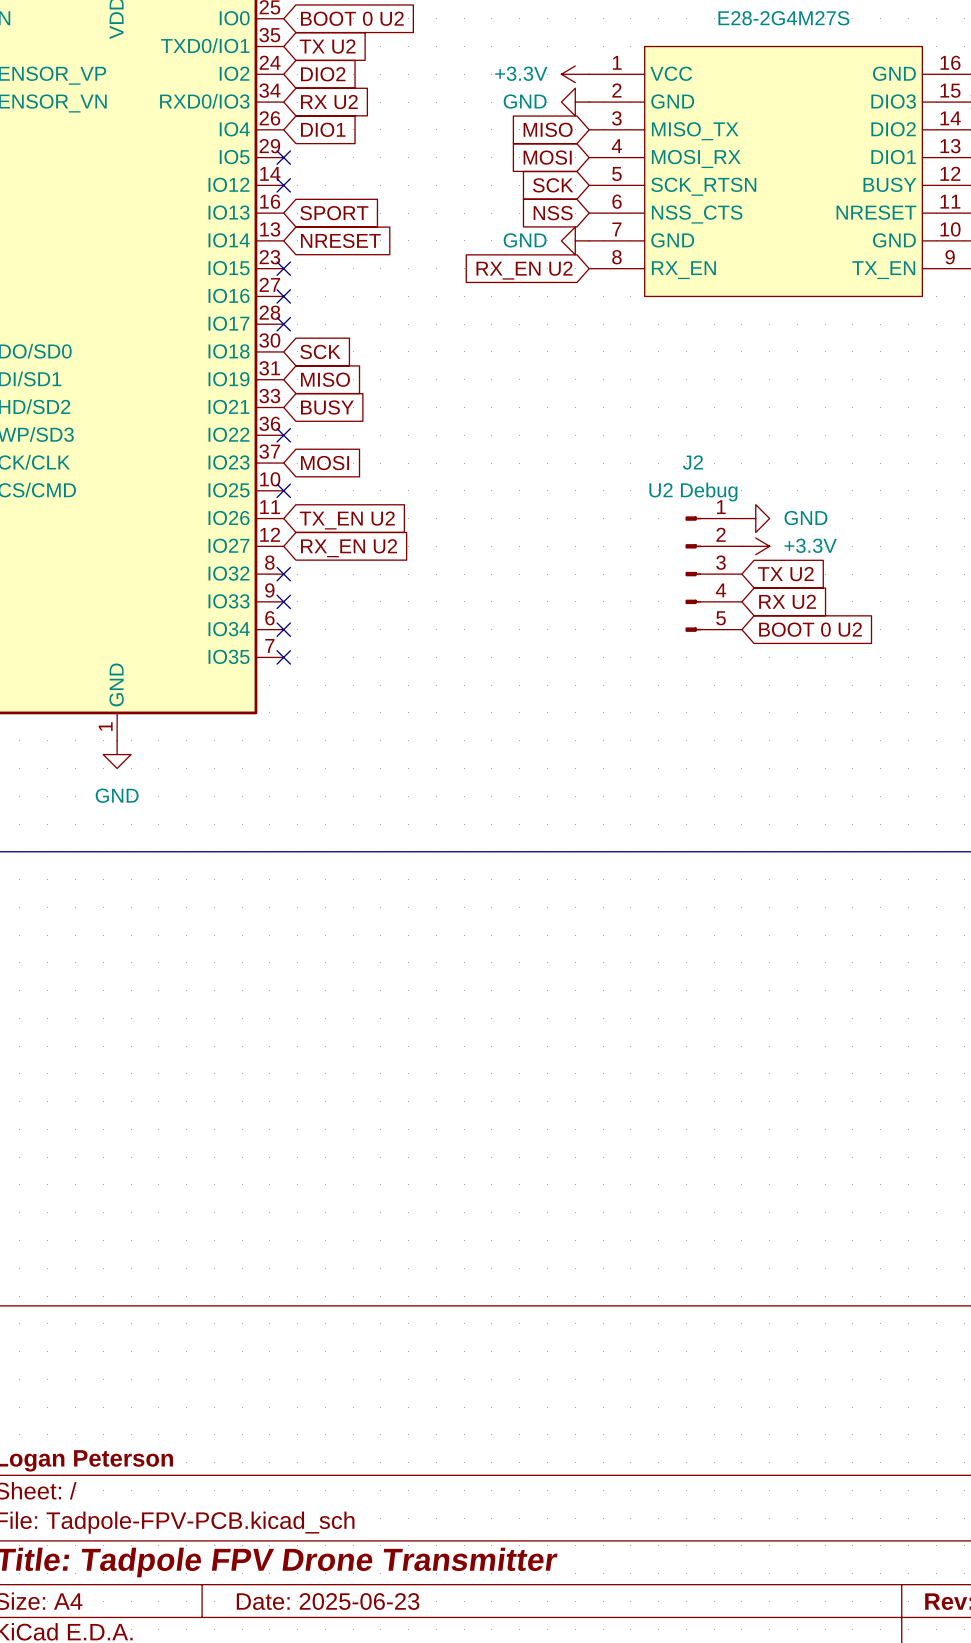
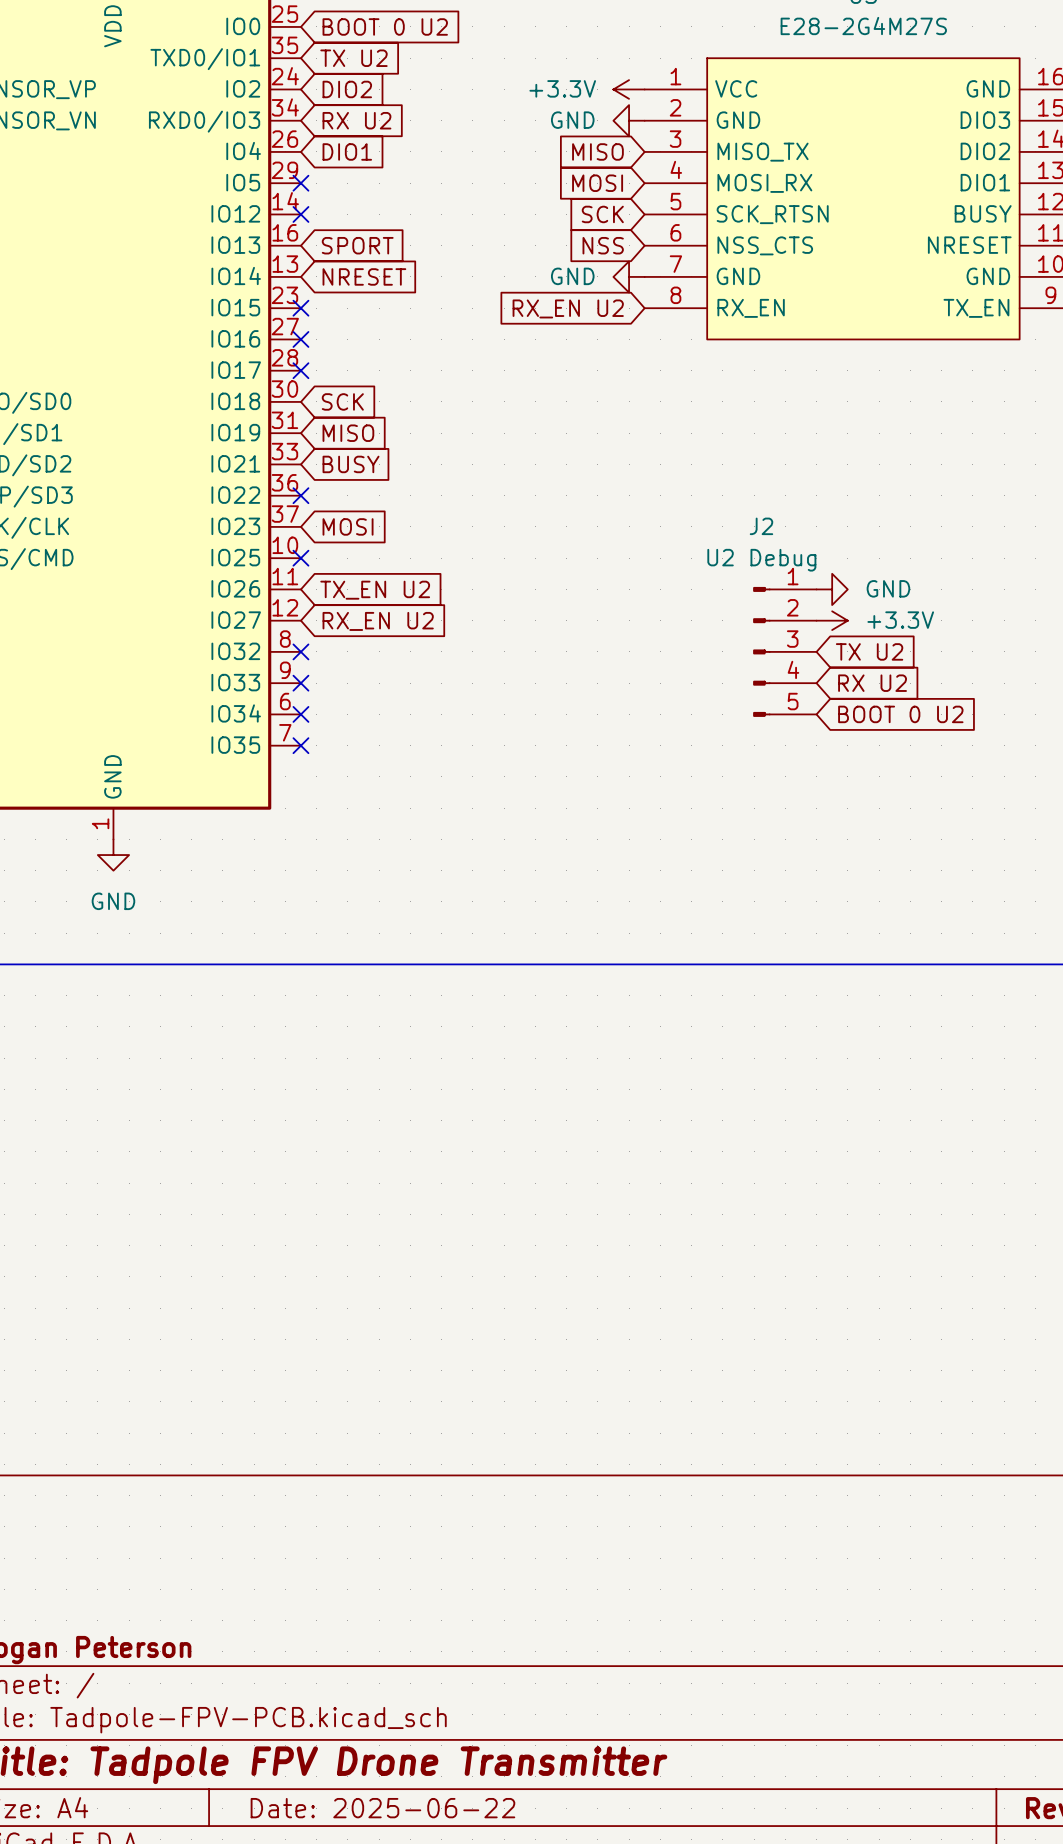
title block: Date: 2025-06-23 (328, 1601) -> Date: 2025-06-22 (382, 1808)

